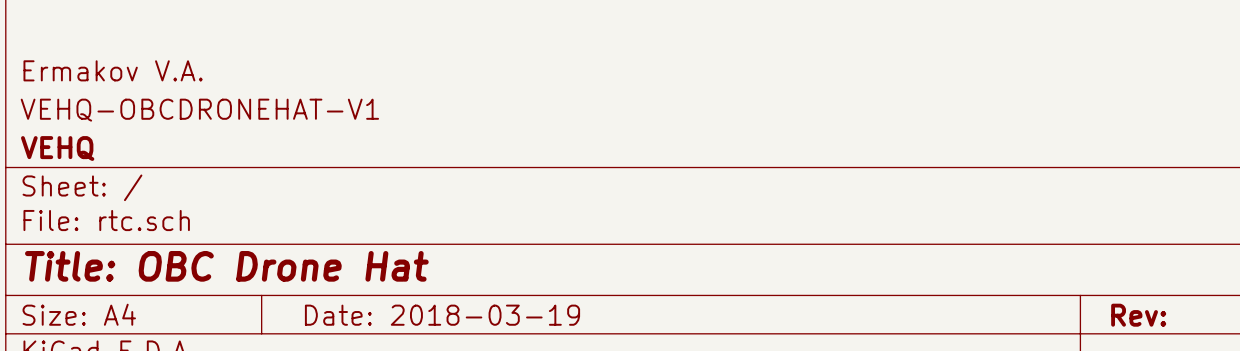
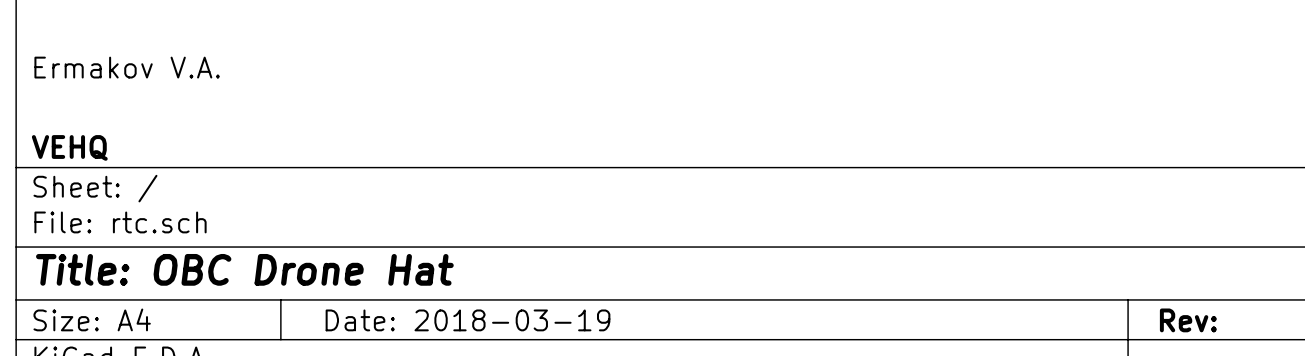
title block: VEHQ-OBCDRONEHAT-V1 (199, 110) -> none

